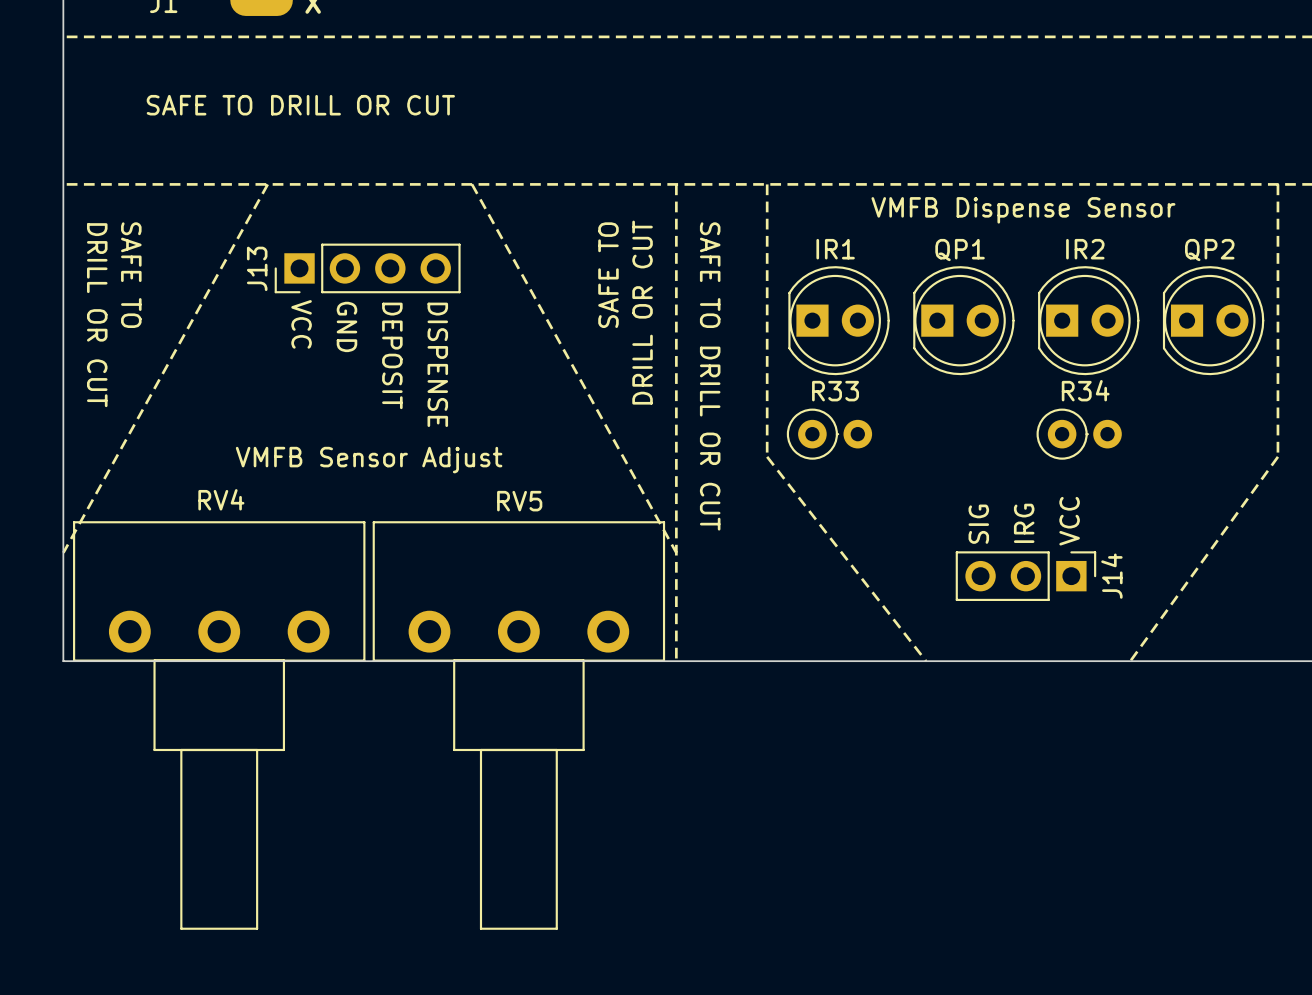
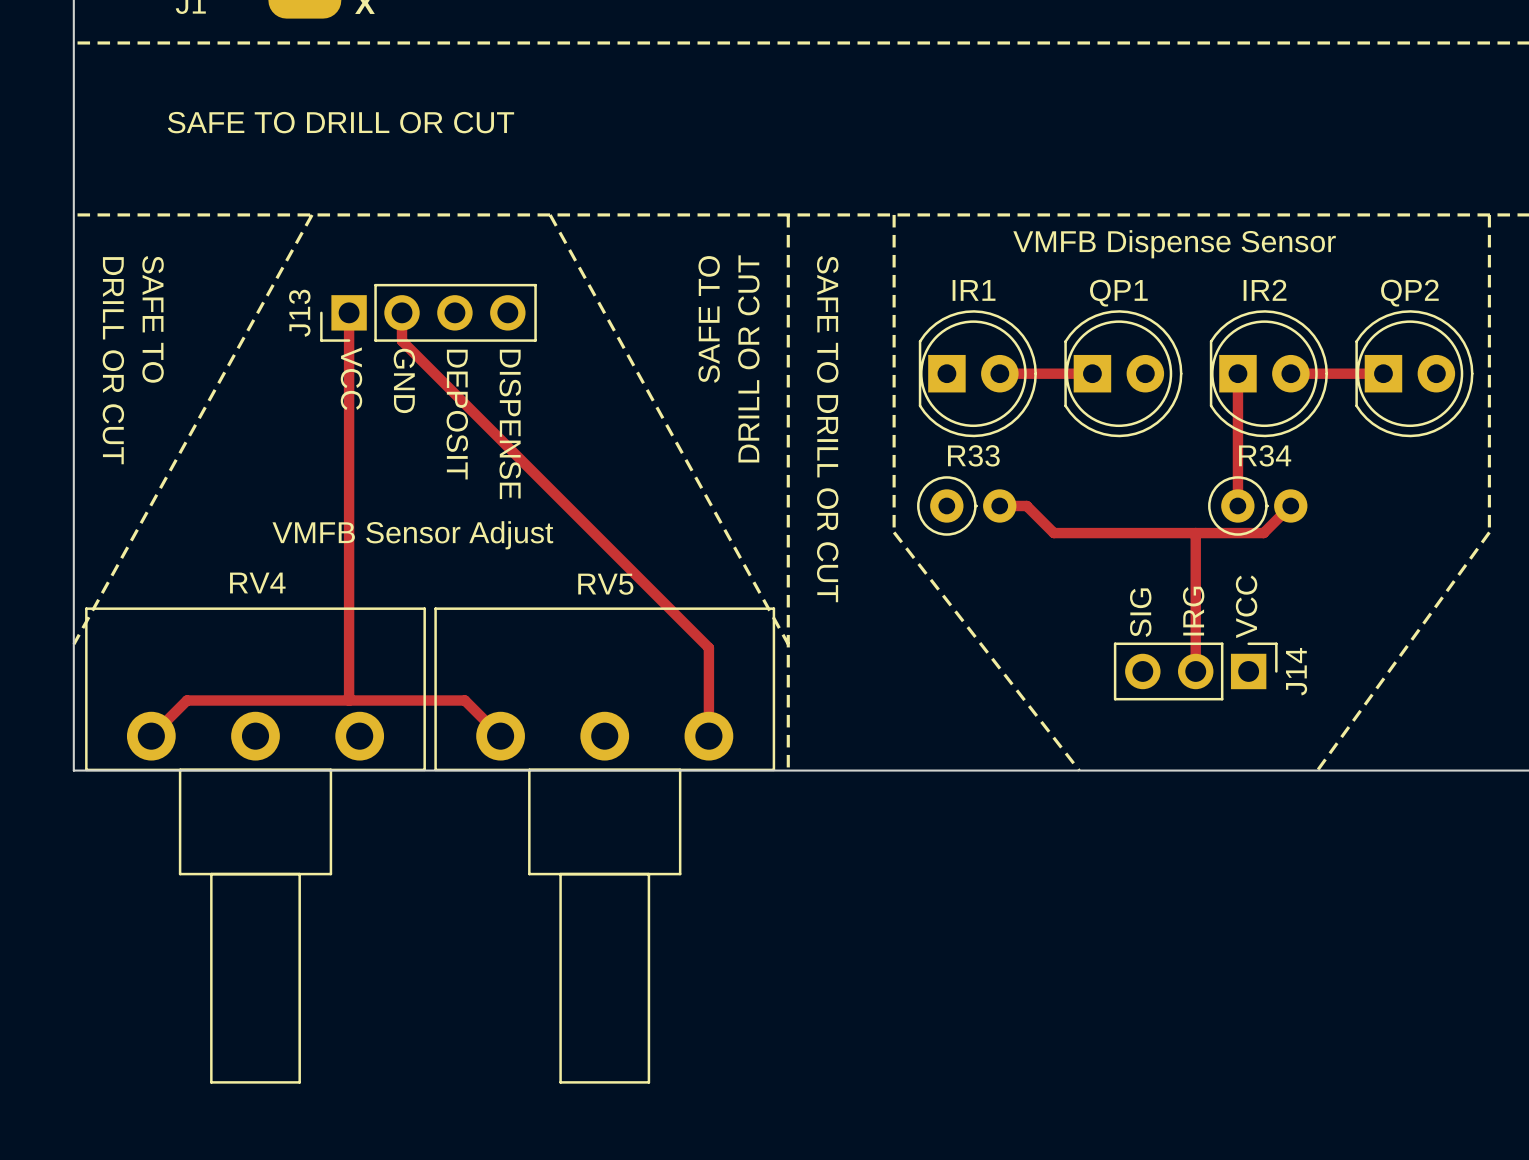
track: none -> (349, 312) (349, 700)
track: none -> (402, 312) (402, 340) (708, 647) (708, 736)
track: none -> (999, 373) (1092, 373)
track: none -> (1237, 373) (1237, 505)
track: none -> (1290, 373) (1383, 373)
track: none -> (999, 505) (1026, 505) (1053, 533) (1263, 533) (1290, 505)
track: none -> (1195, 533) (1195, 671)
track: none -> (151, 736) (187, 700) (464, 700) (500, 736)

